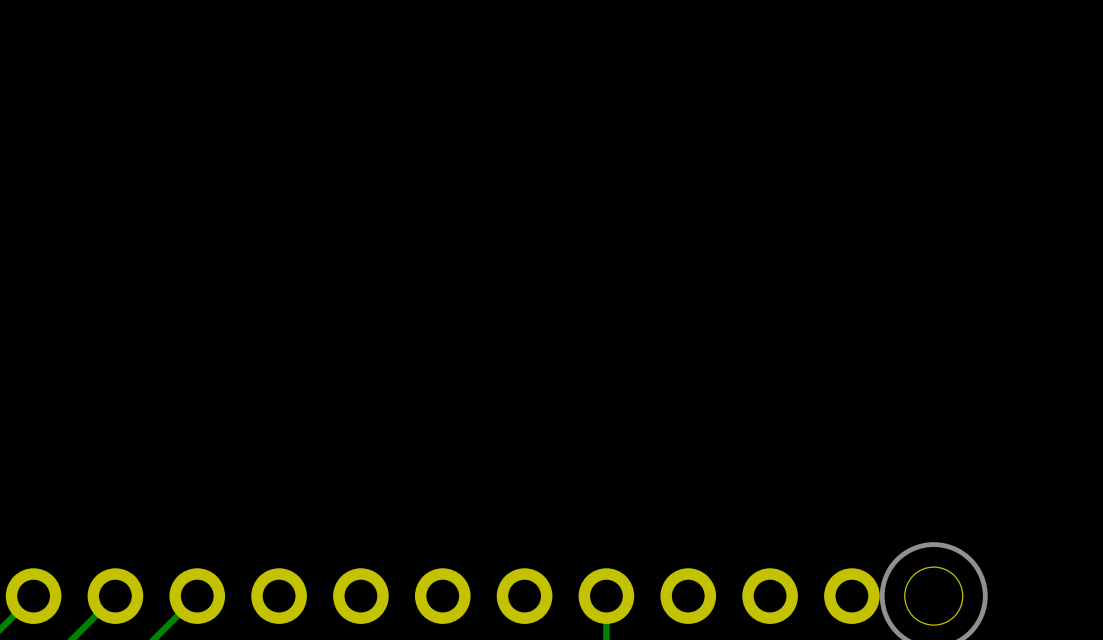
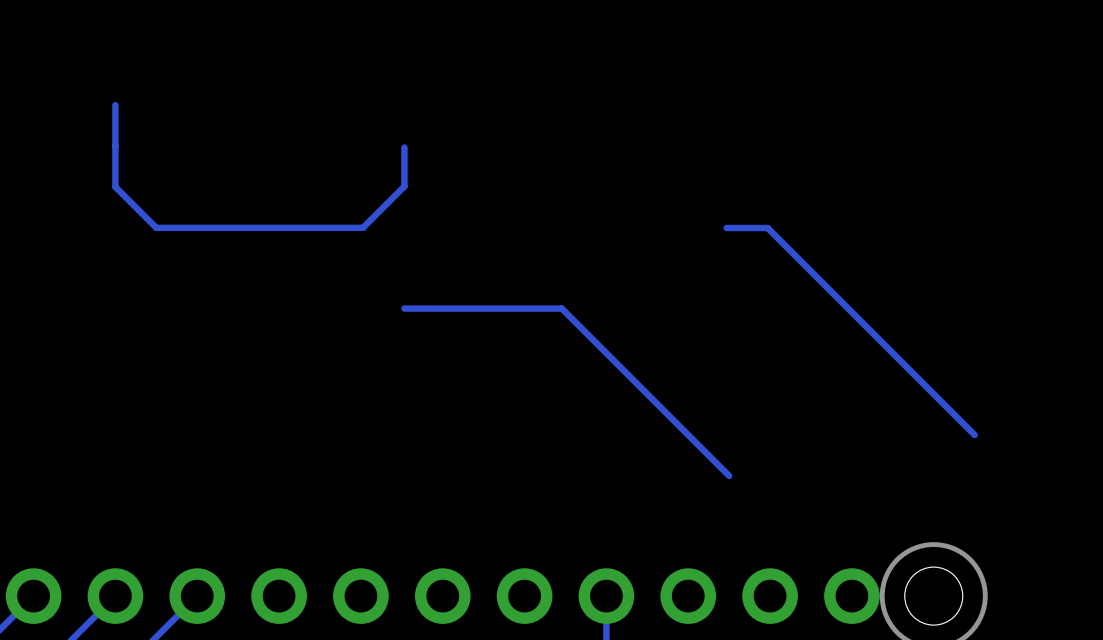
bottom track: none -> (115, 105) (115, 186) (156, 227) (362, 227) (404, 186) (404, 147)
bottom track: none -> (726, 228) (767, 228) (974, 435)
bottom track: none -> (404, 308) (561, 308) (729, 475)

